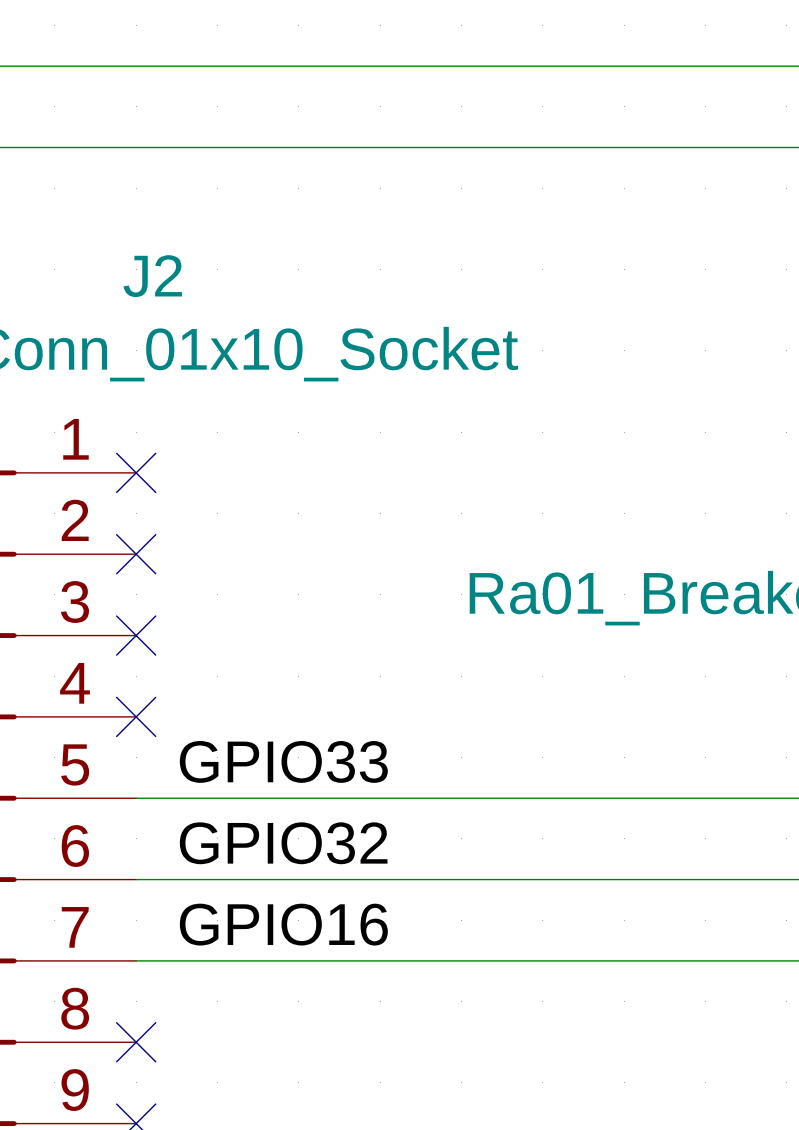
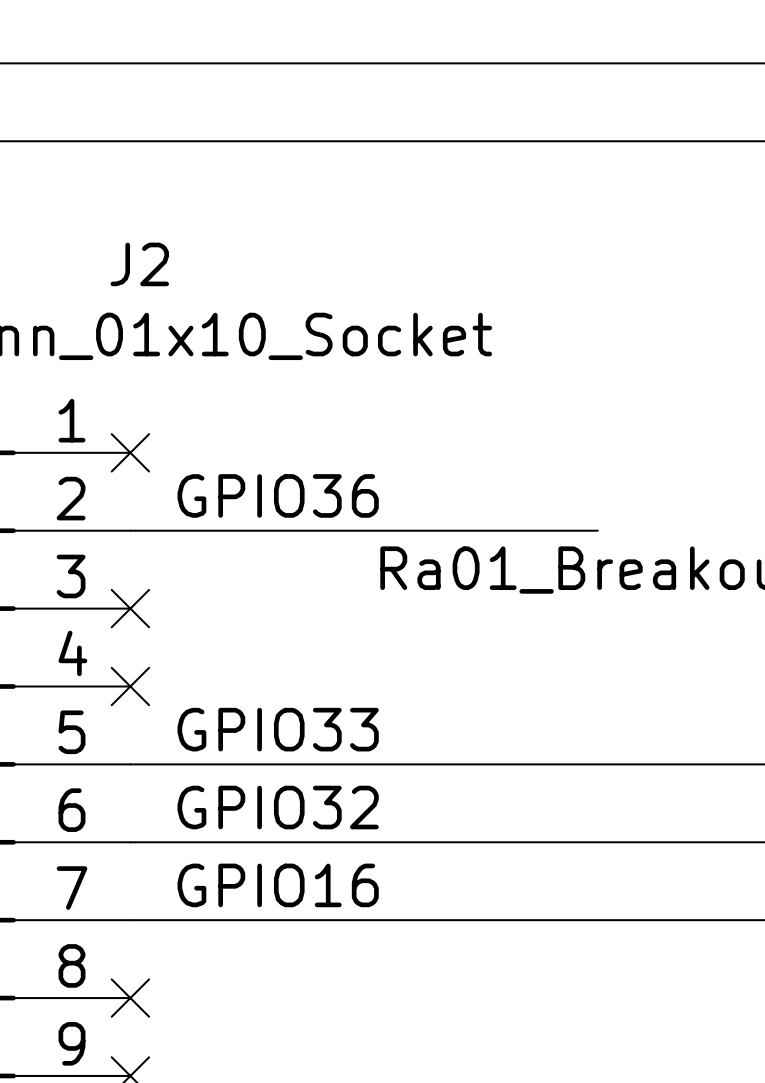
label: none -> GPIO36 (278, 495)
wire: none -> (130, 530) (597, 530)
no-connect mark: (136, 554) -> none

